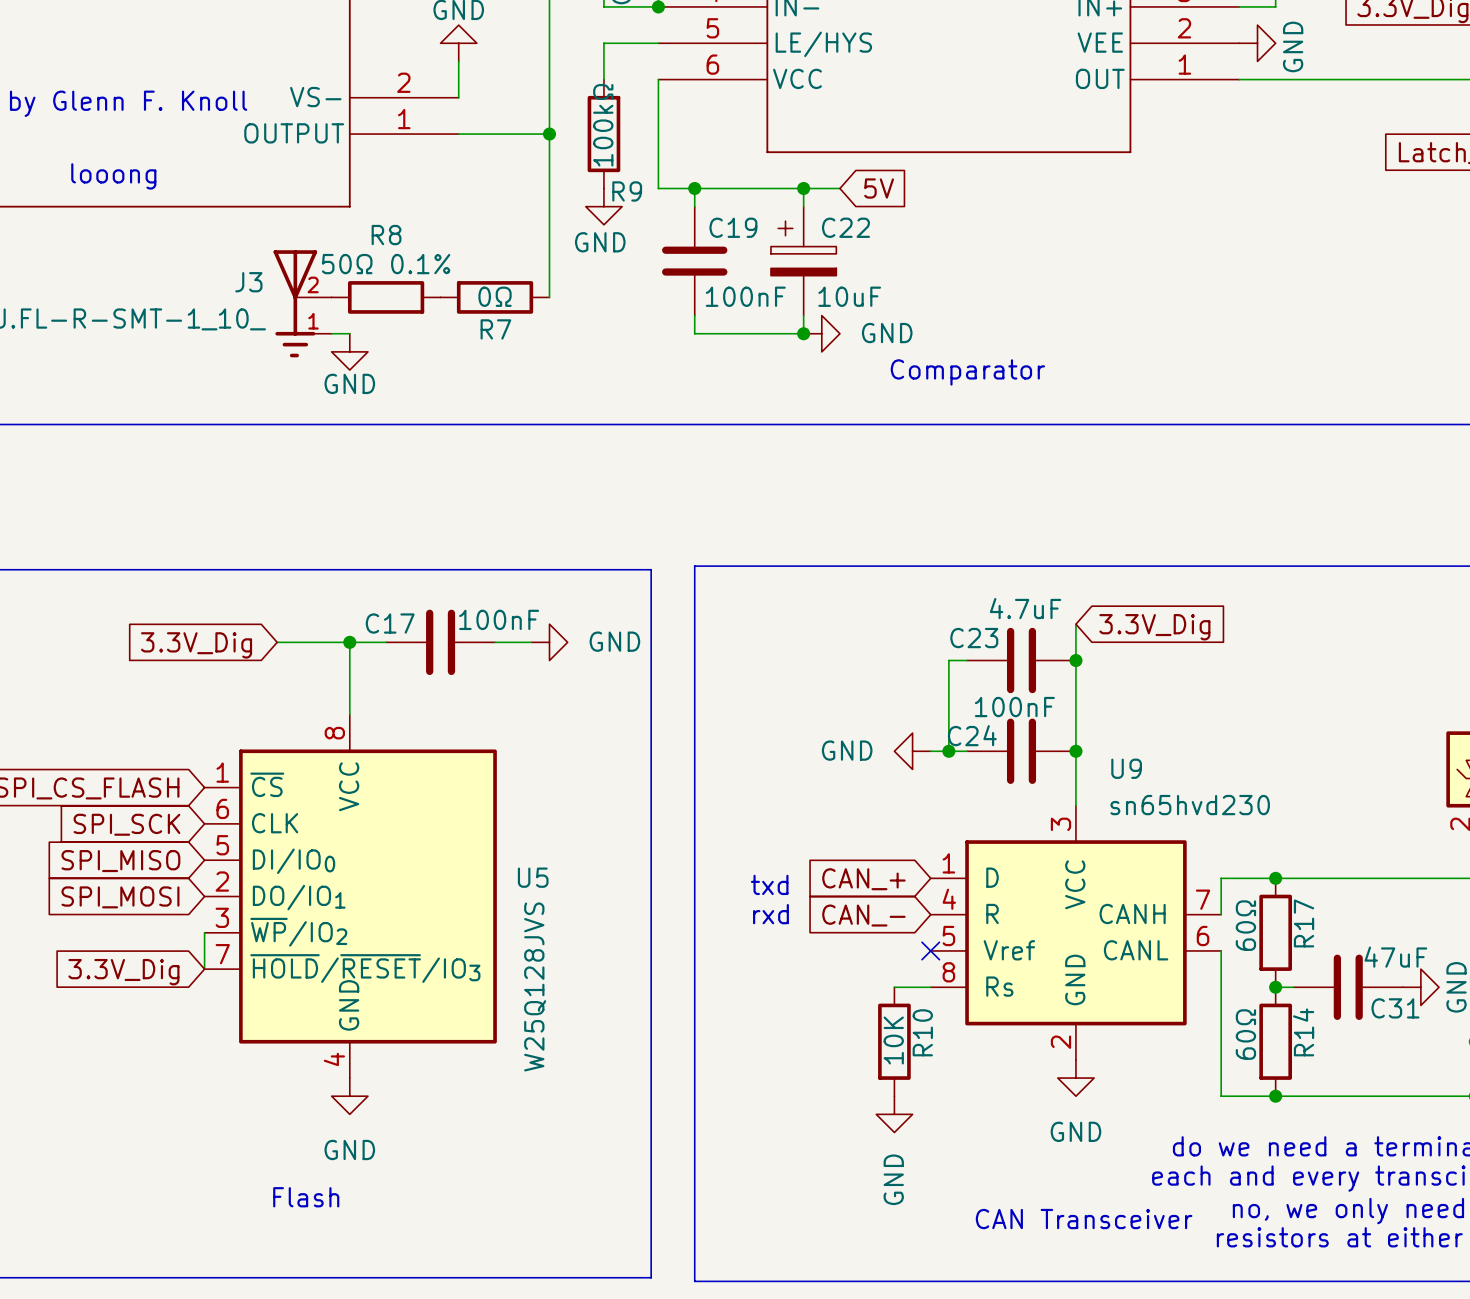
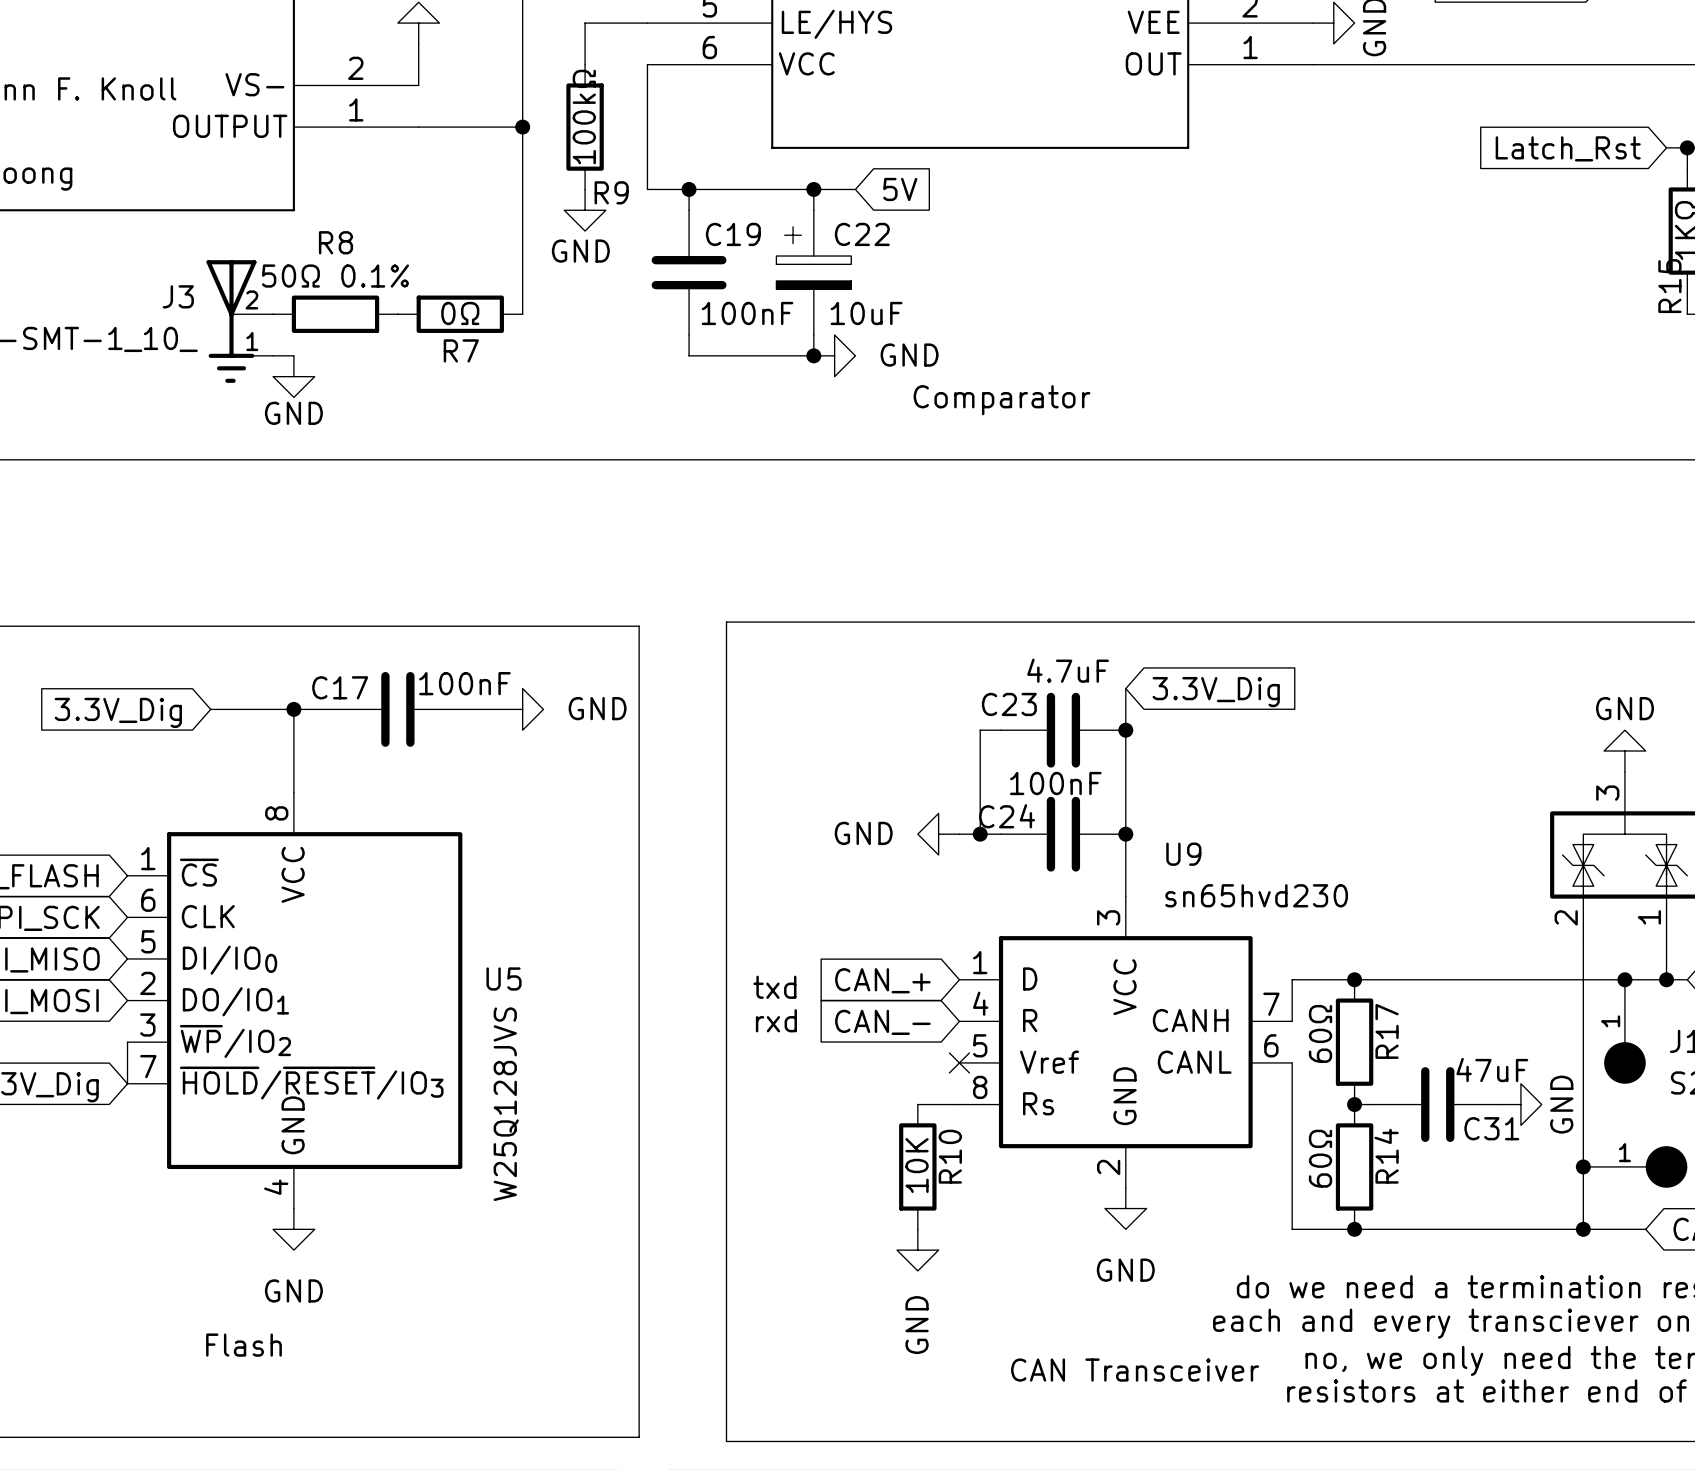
line: (727, 566) (694, 566) (694, 1281) (727, 1281) -> (726, 622) (726, 1441)

